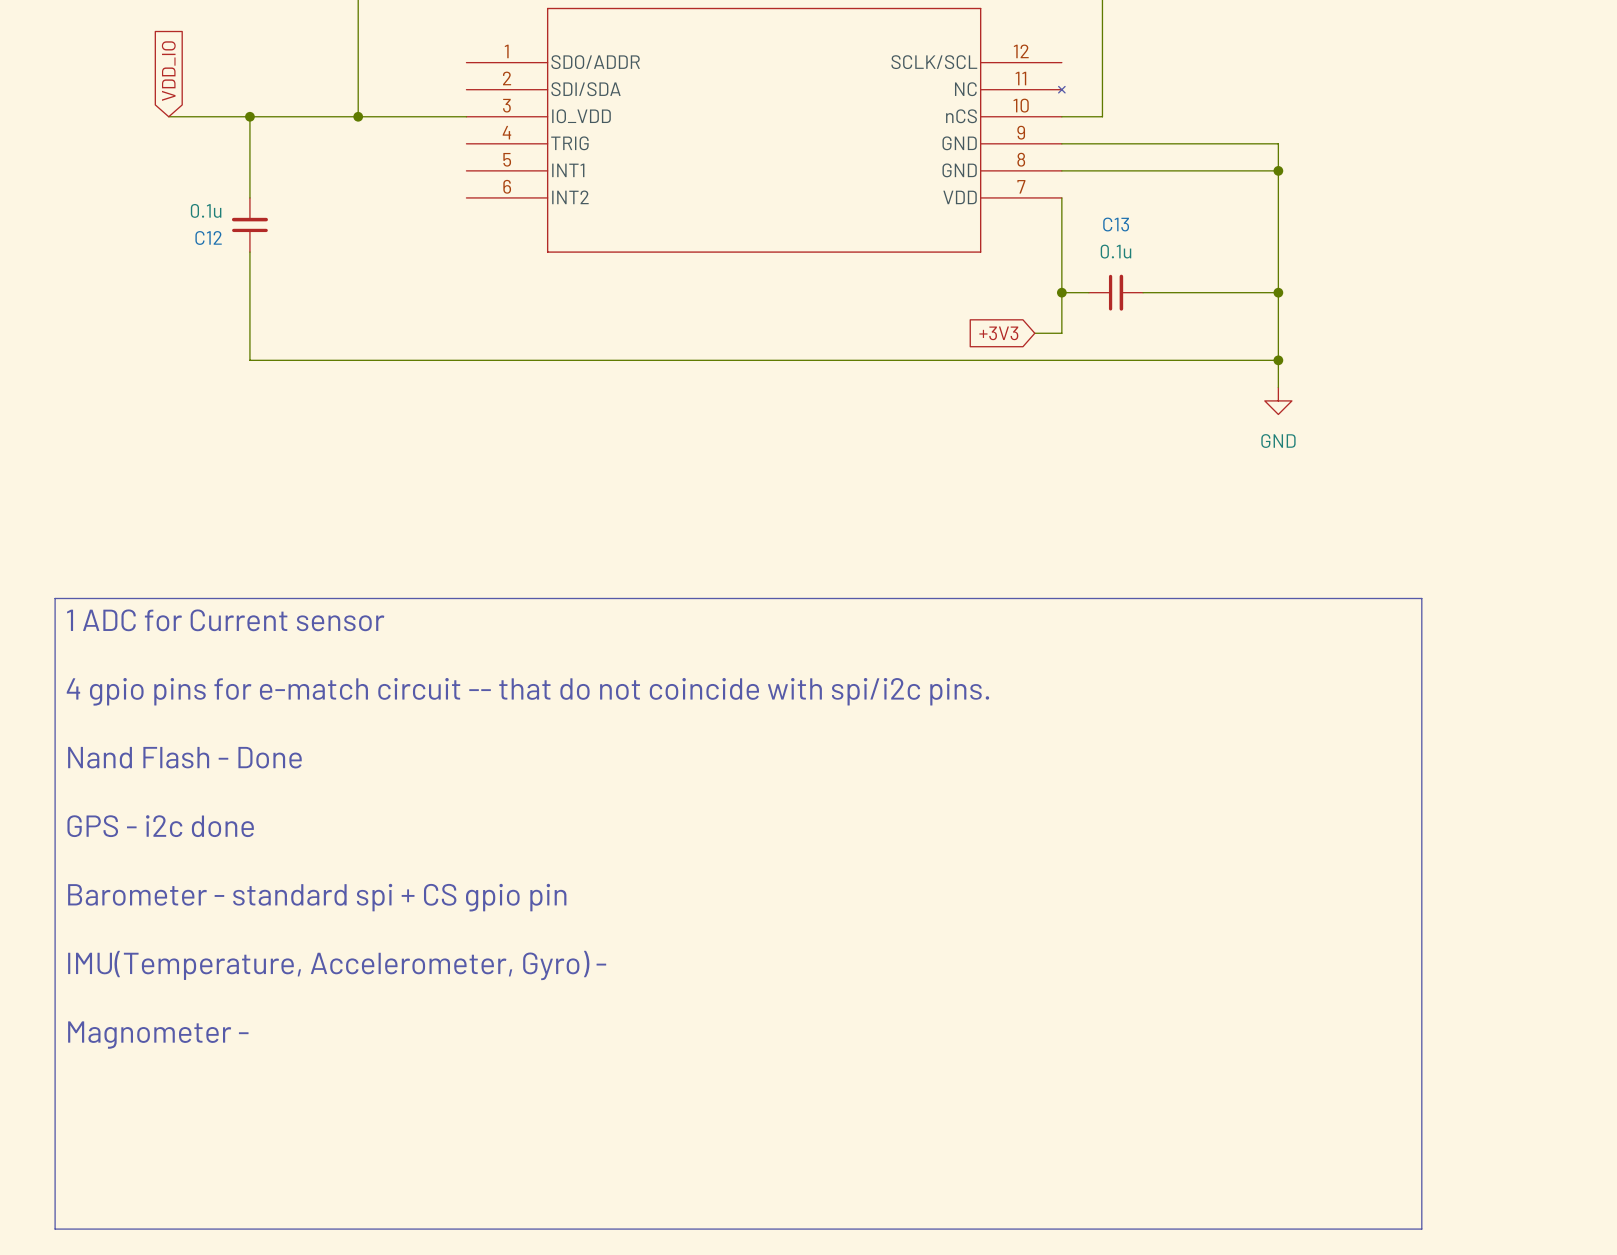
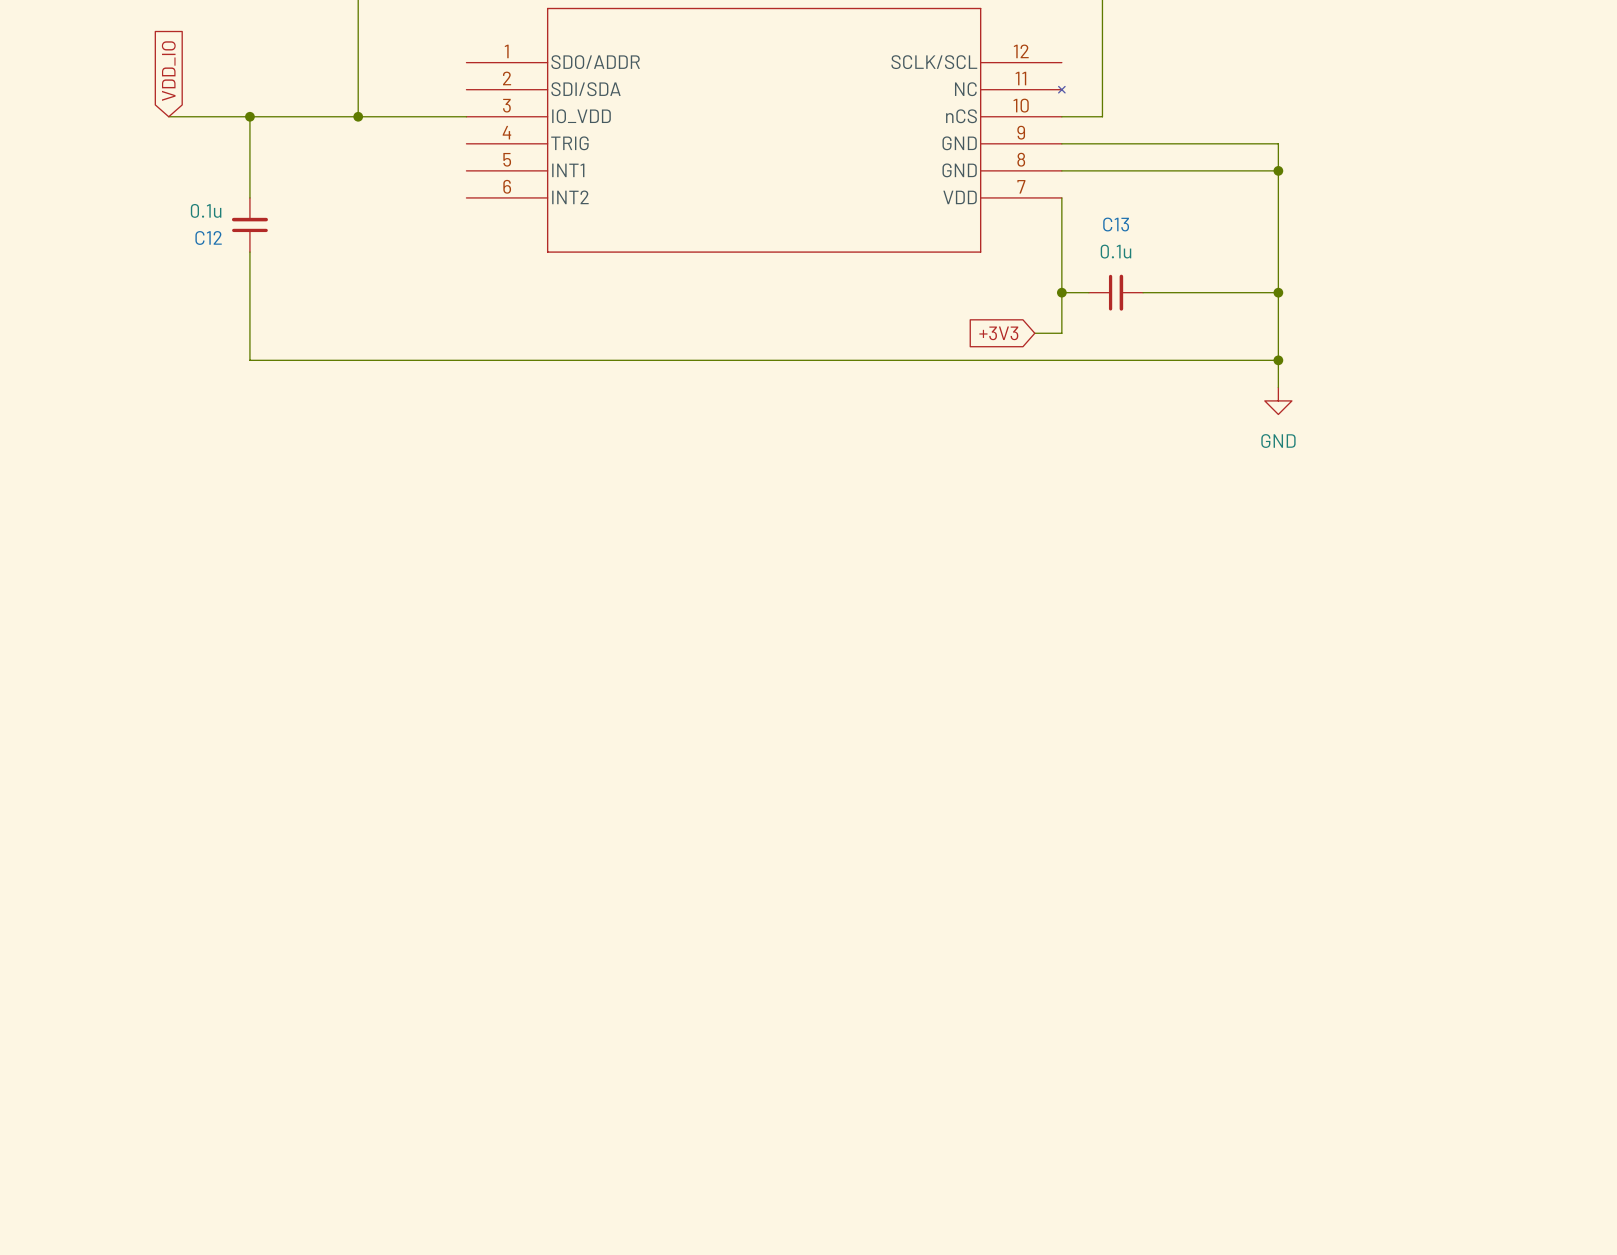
line: (55, 598) (1421, 598) (1421, 1229) (55, 1229) (55, 598) -> none
text: 1 ADC for Current sensor (225, 620) -> none
text: 4 gpio pins for e-match circuit -- that do not coincide with spi/i2c pins. (527, 691) -> none
text: Nand Flash - Done (184, 757) -> none
text: GPS - i2c done (160, 826) -> none
text: Barometer - standard spi + CS gpio pin (317, 897) -> none
text: IMU(Temperature, Accelerometer, Gyro) - (337, 965) -> none
text: Magnometer - (158, 1035) -> none

